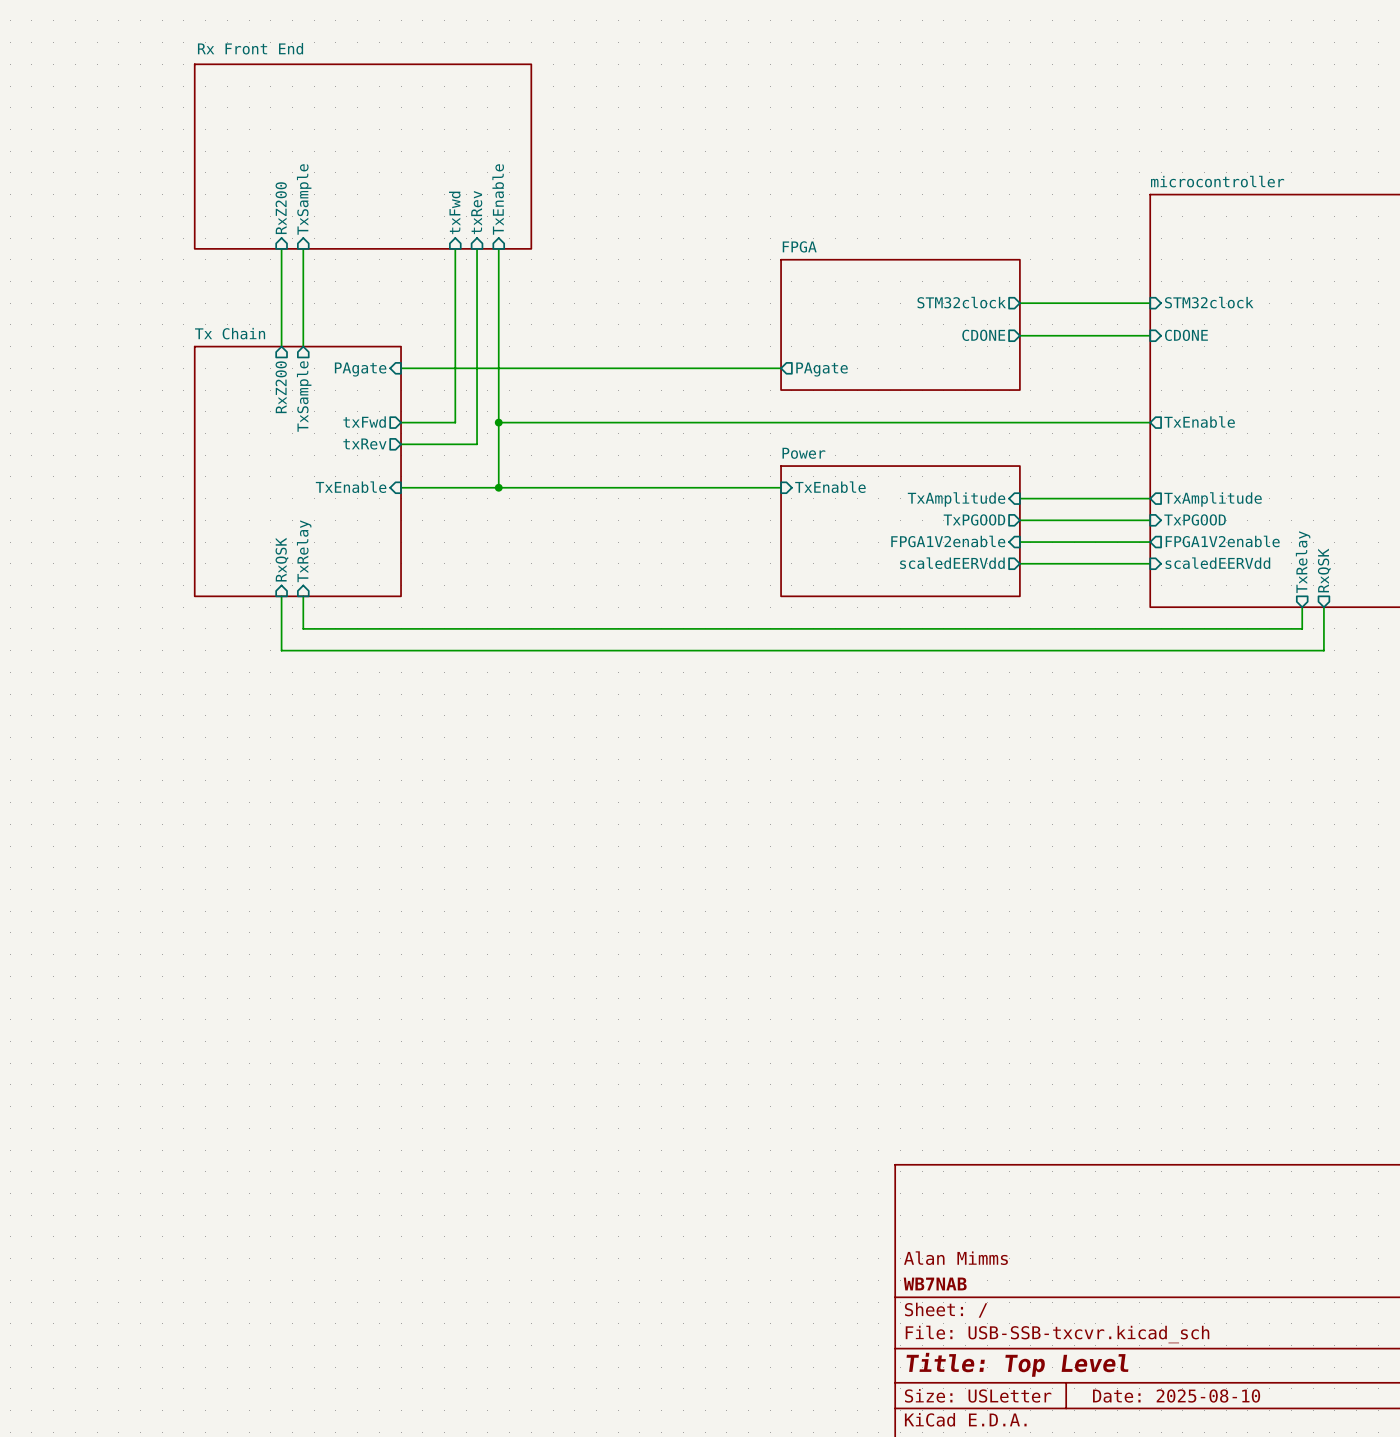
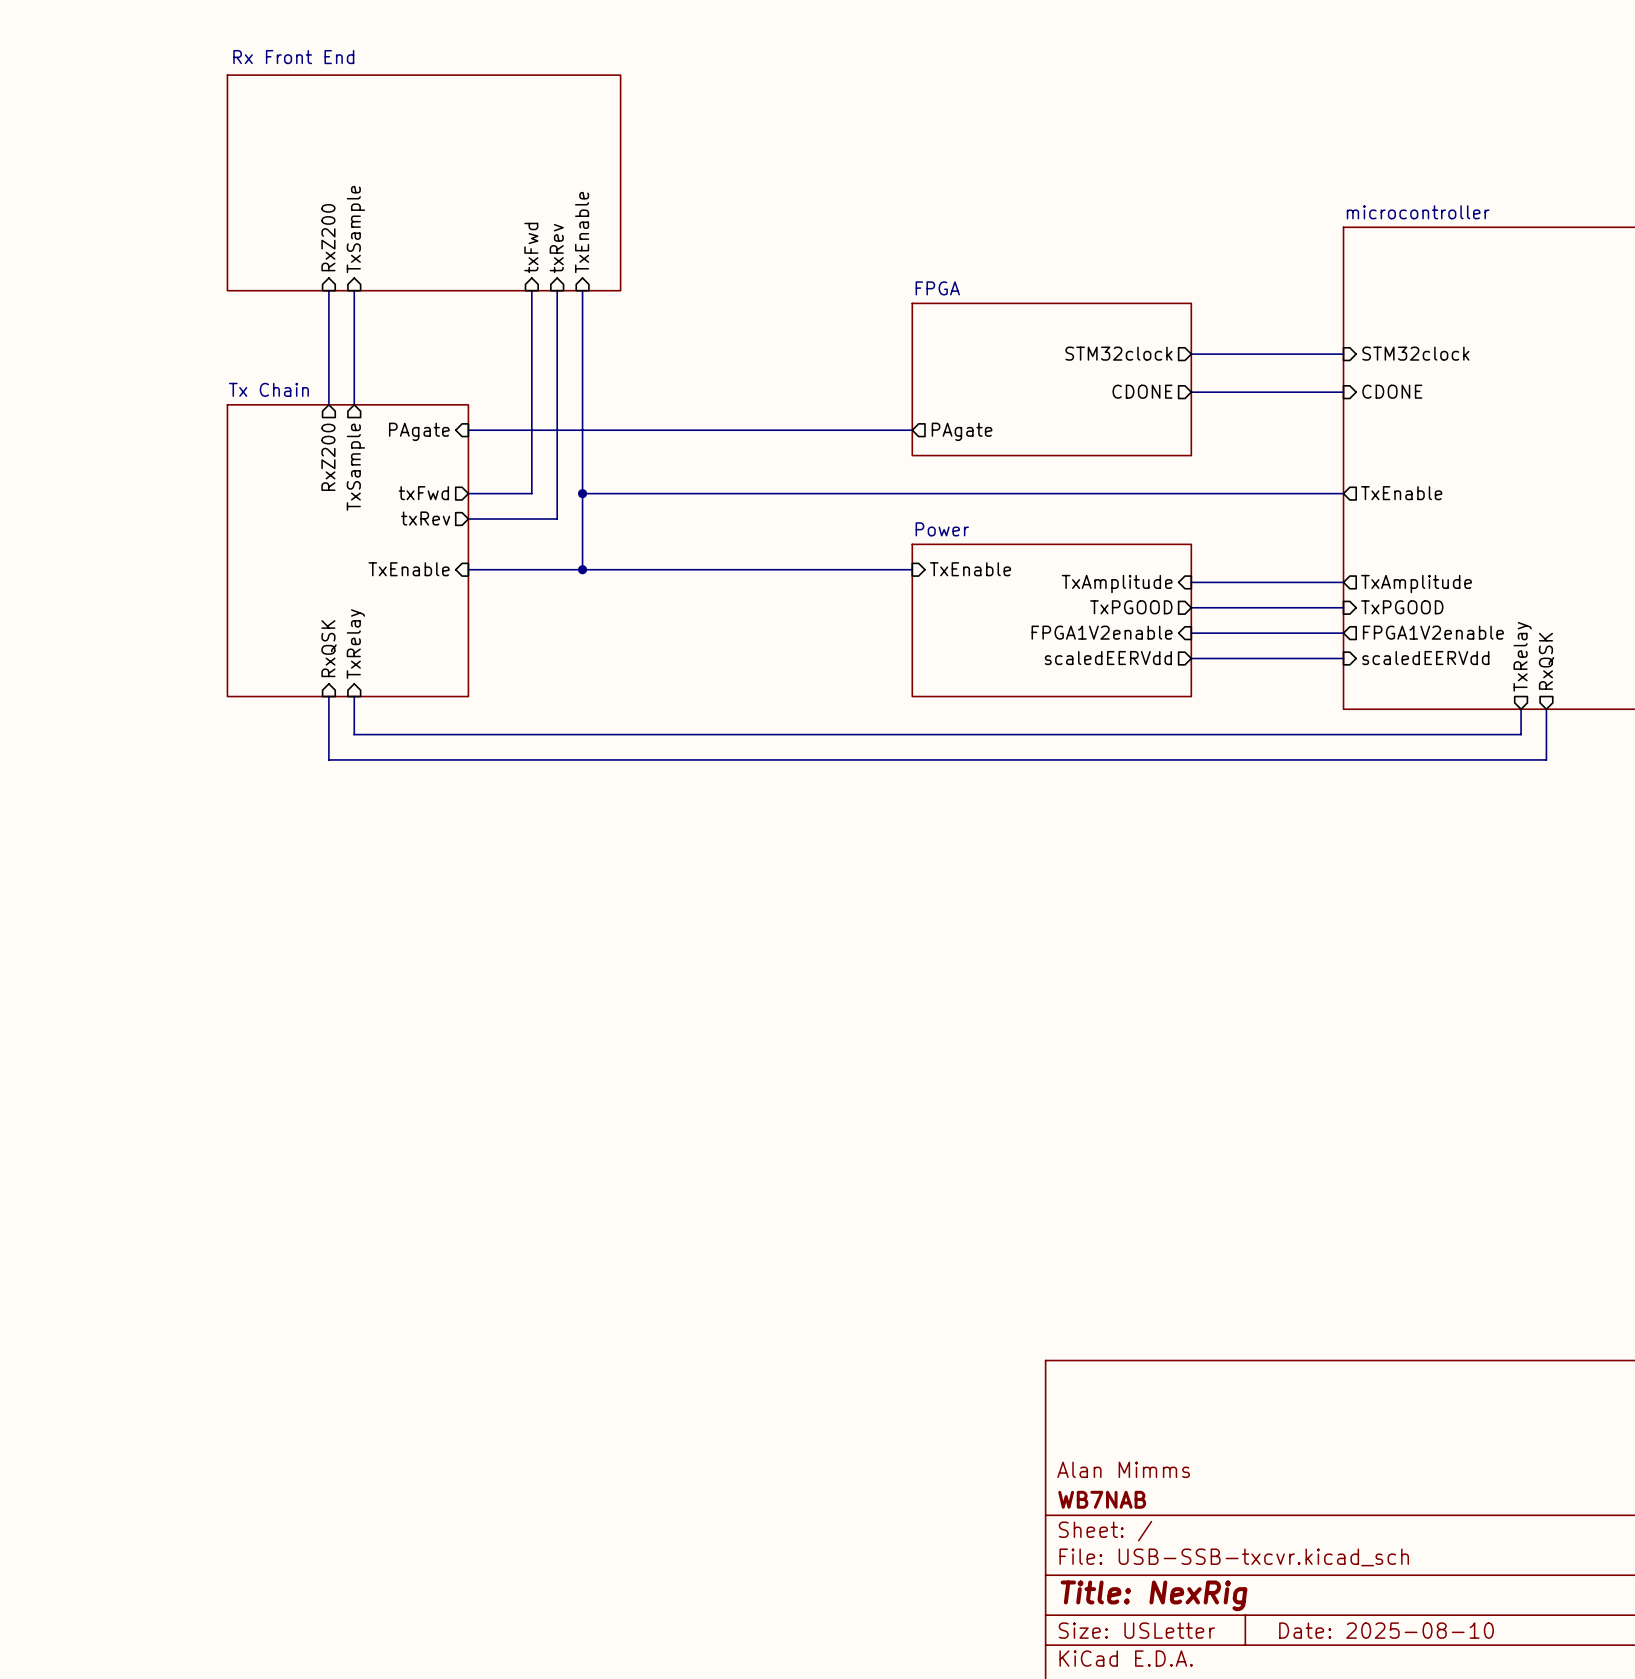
title block: Title: Top Level (1017, 1364) -> Title: NexRig (1153, 1595)

